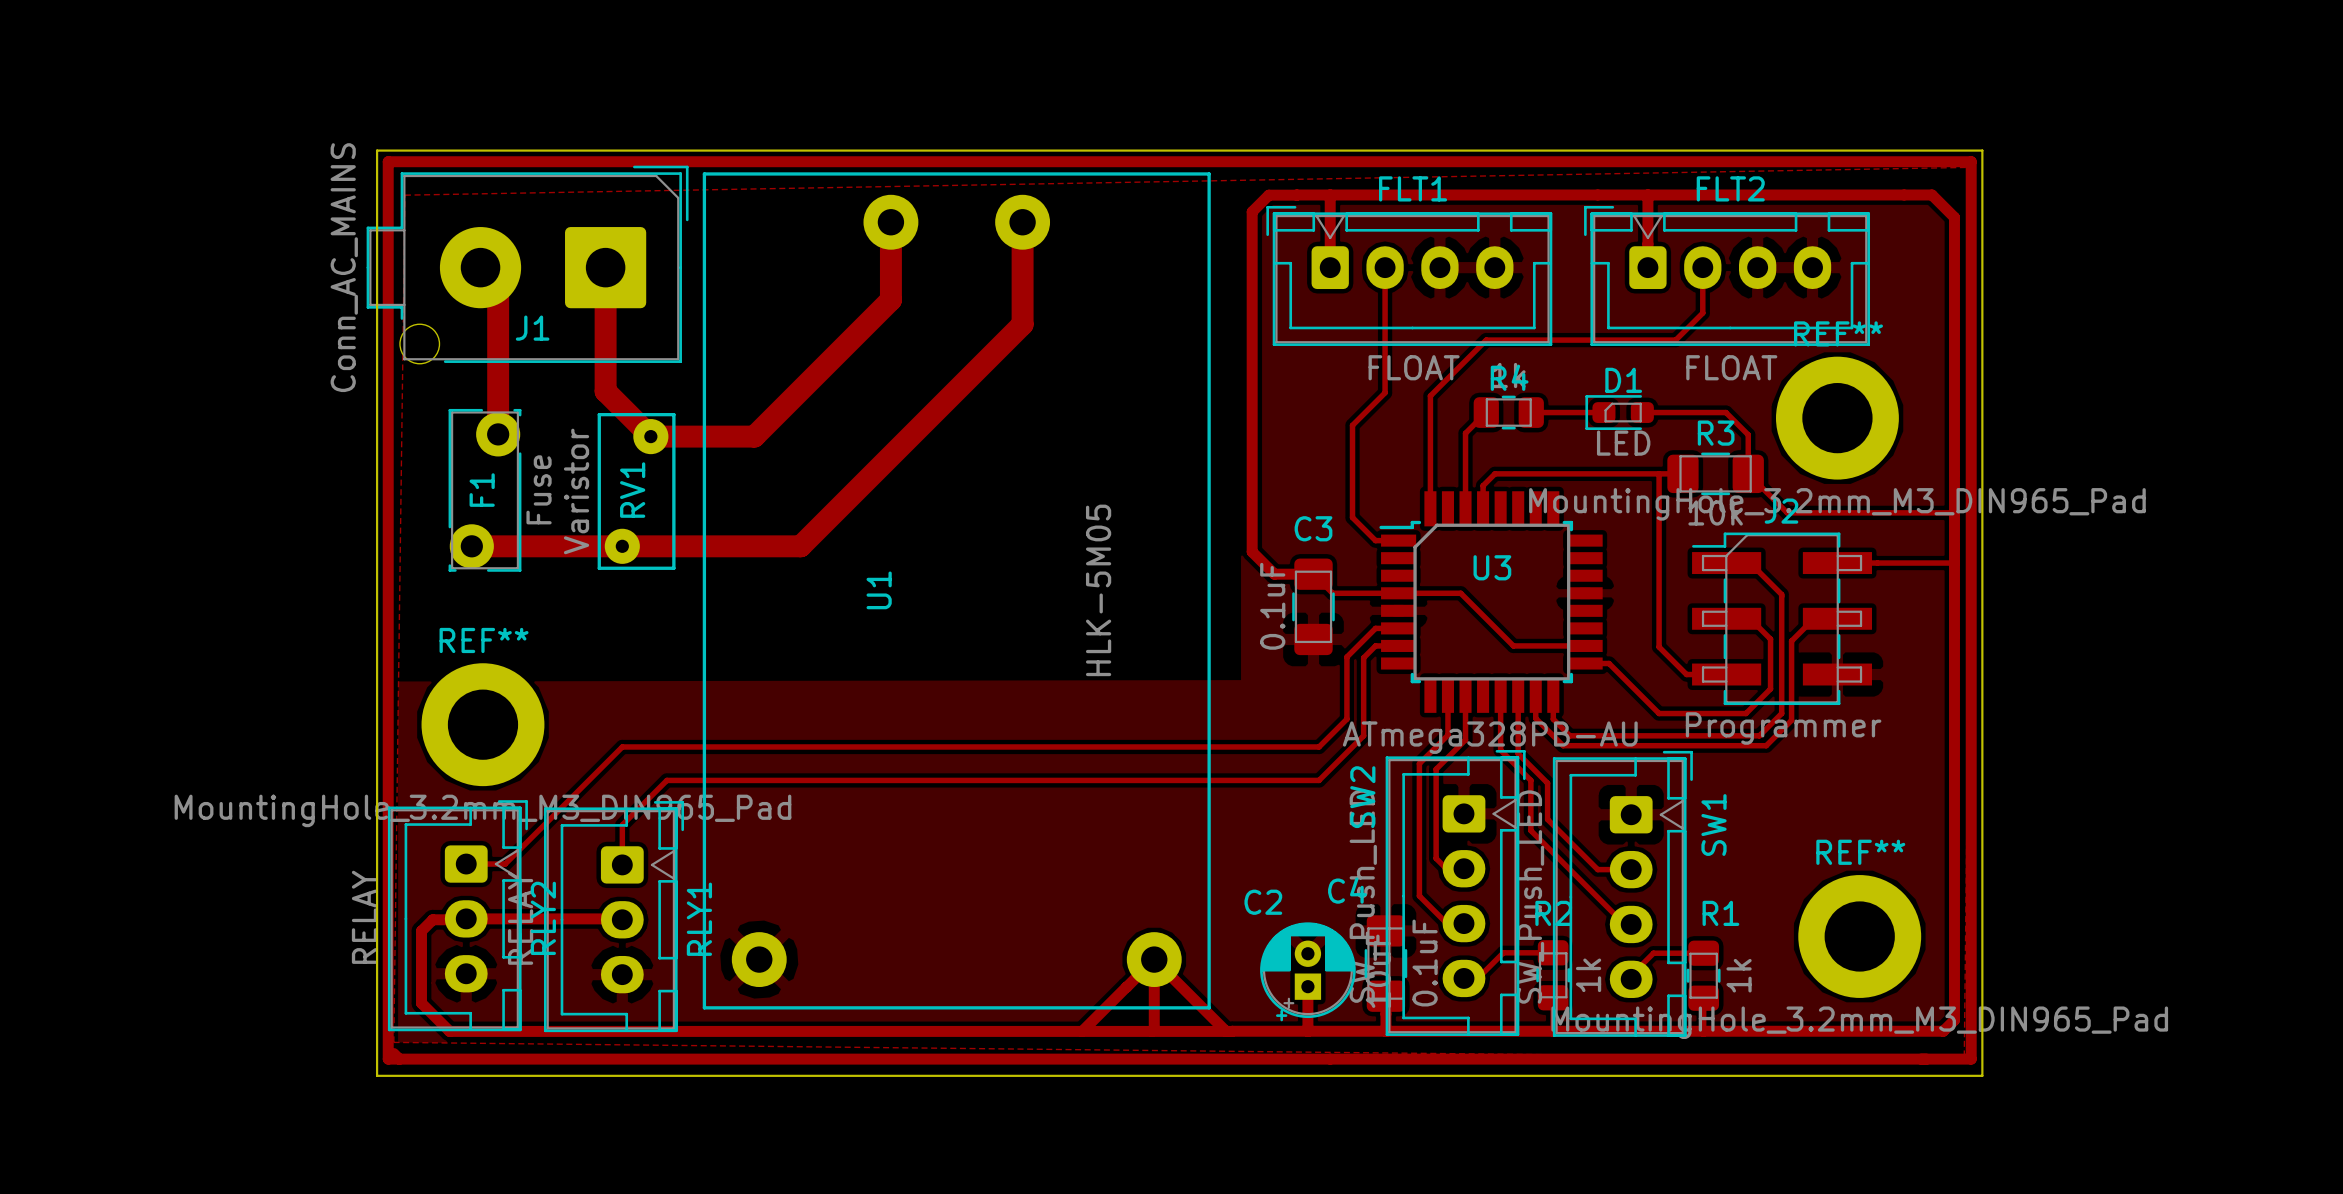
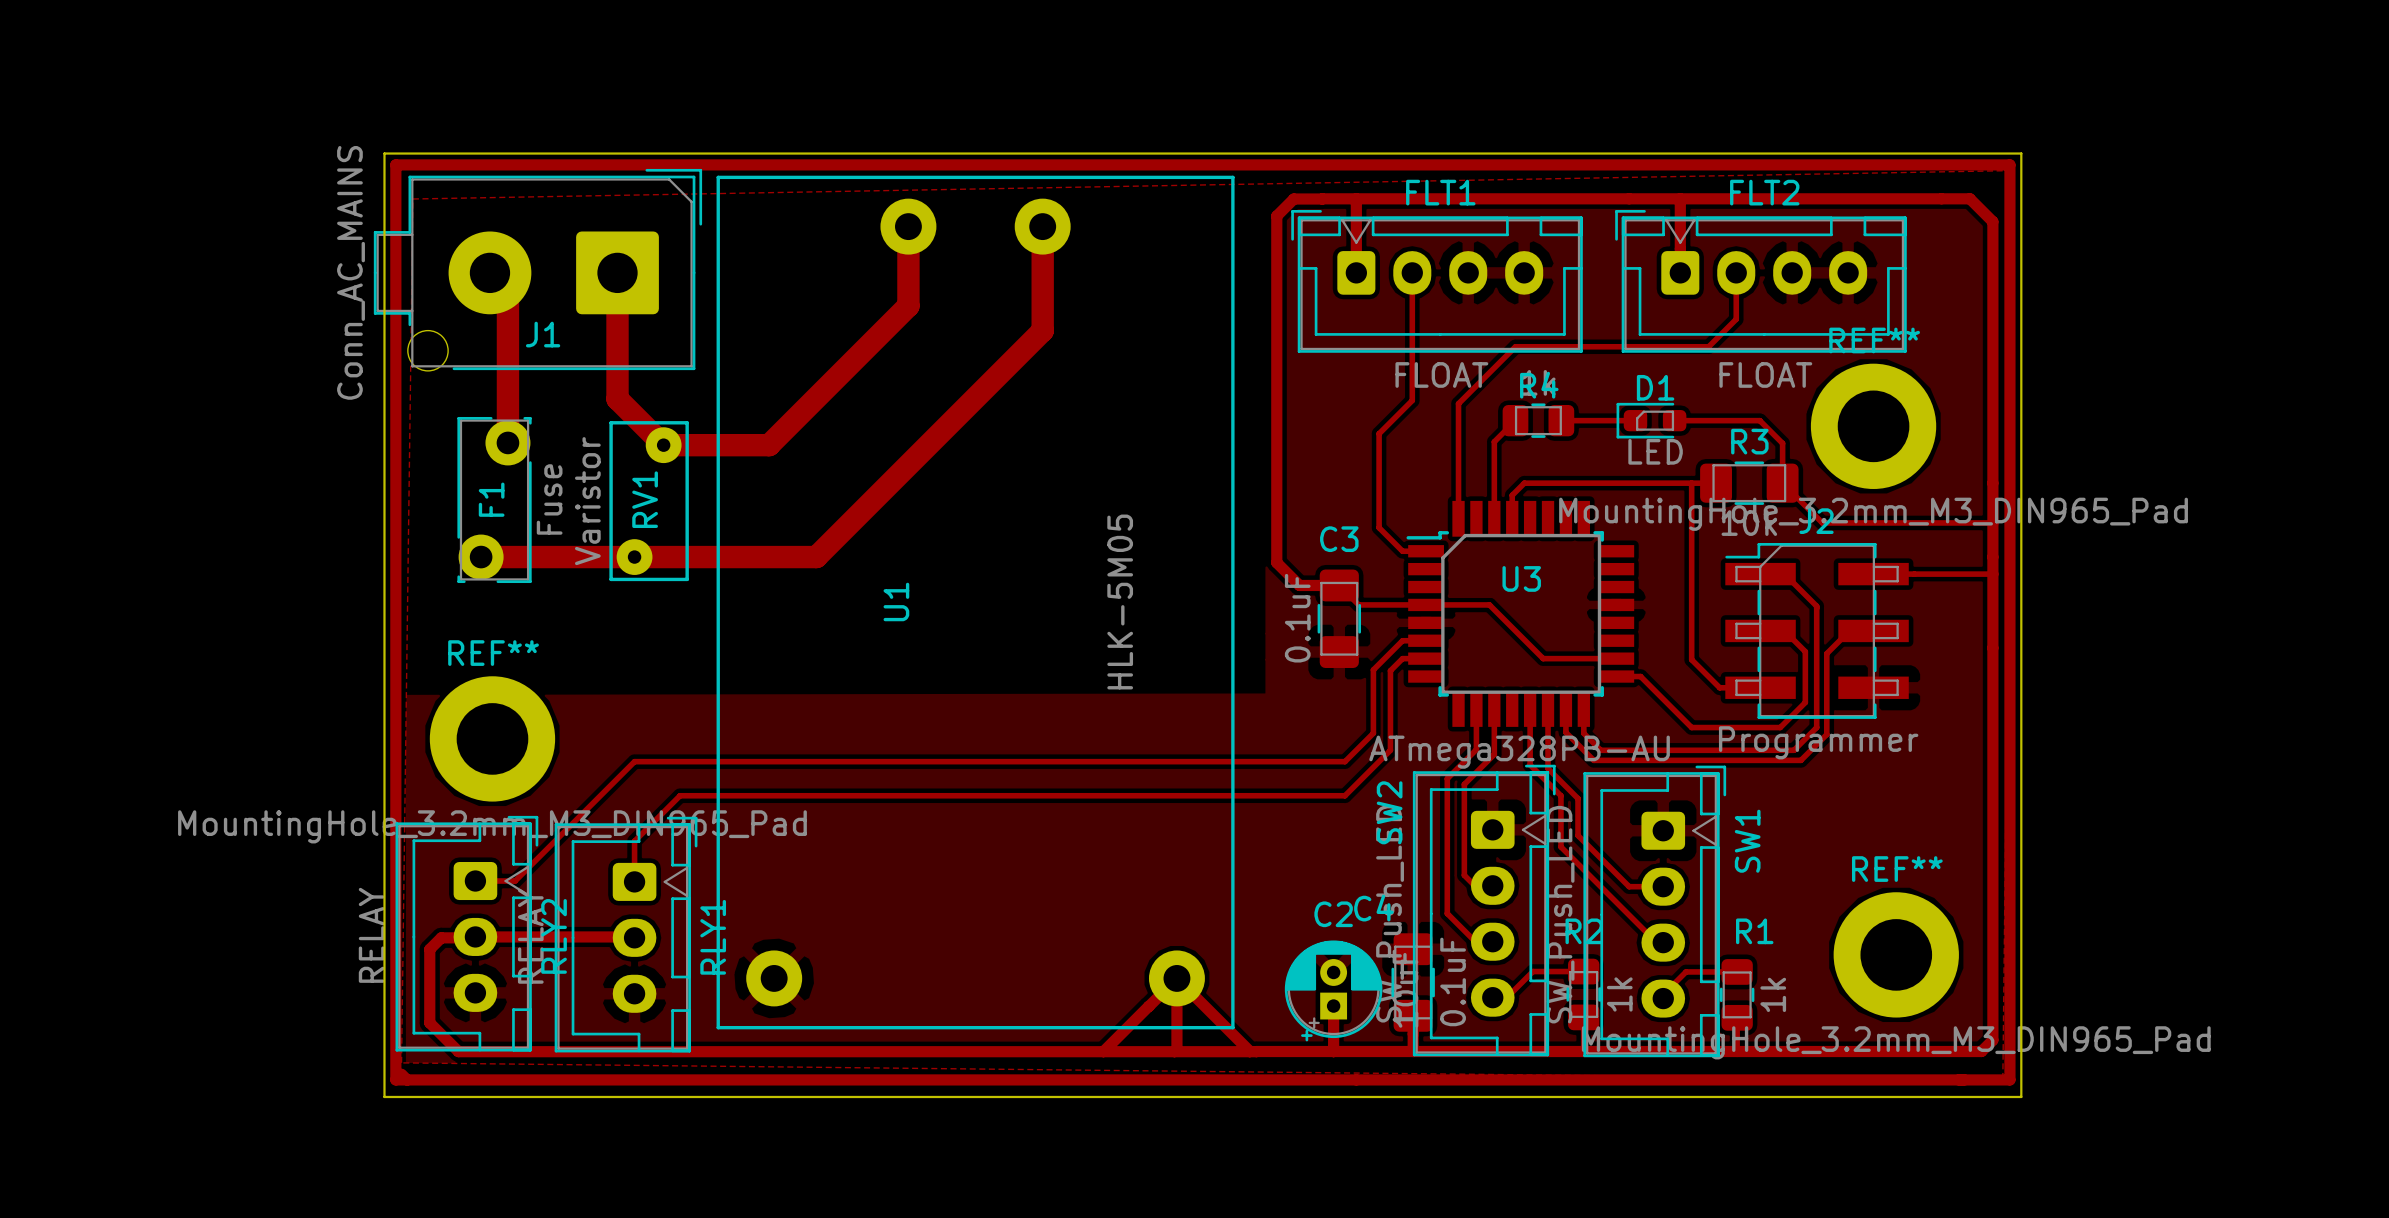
C2 name position: C2 (1263, 902) -> C2 (1333, 914)

